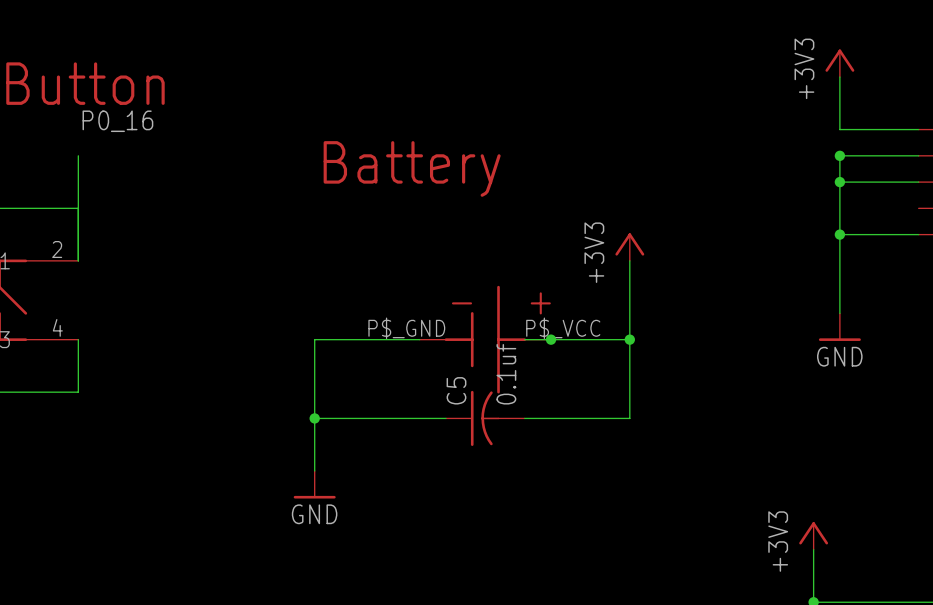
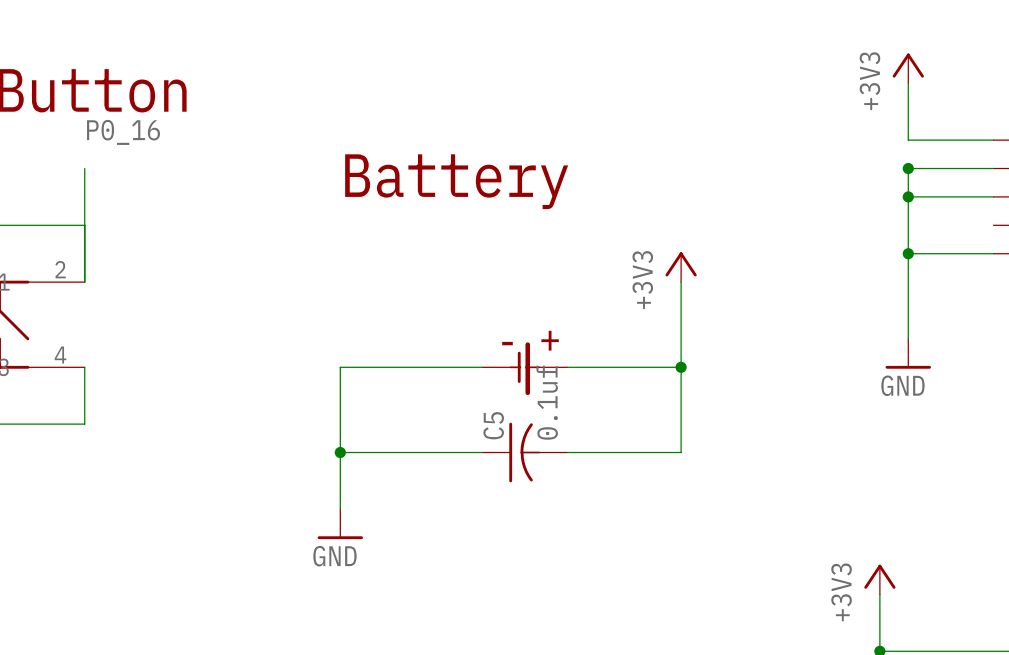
part symbol: [419, 285, 552, 394] -> [482, 342, 568, 396]
junction: (551, 339) -> none

